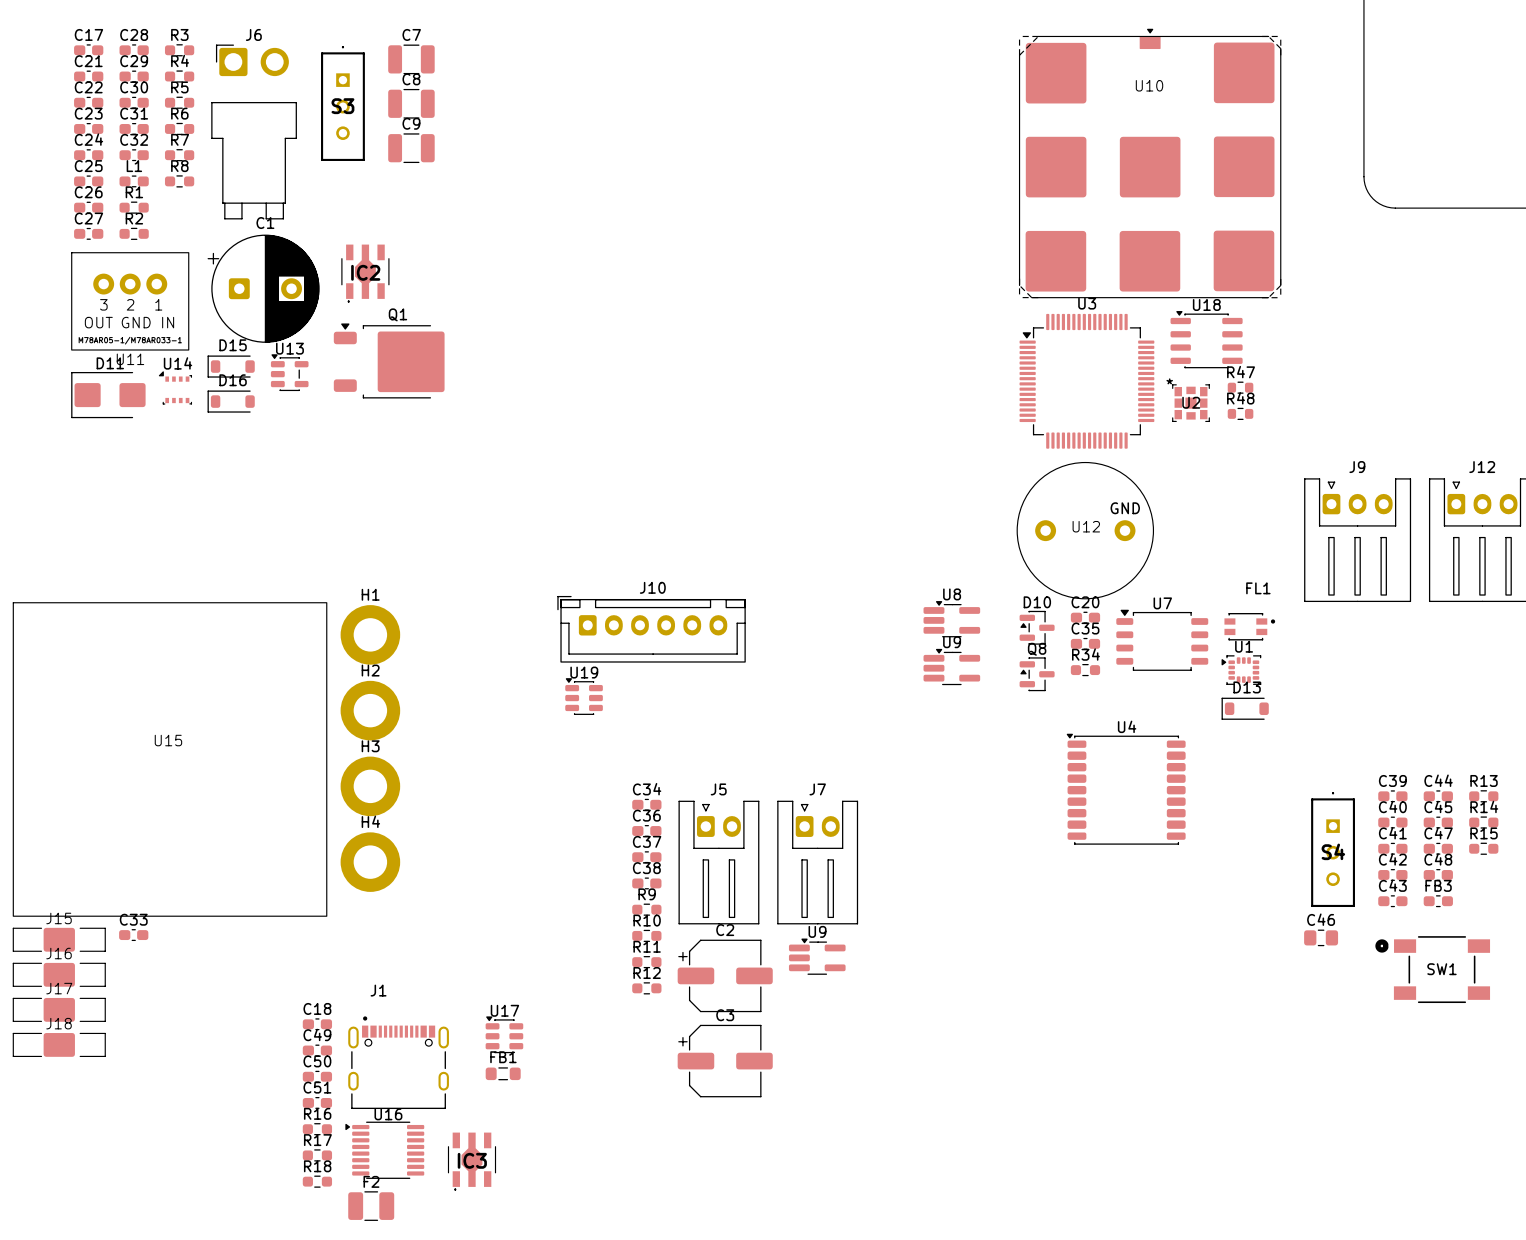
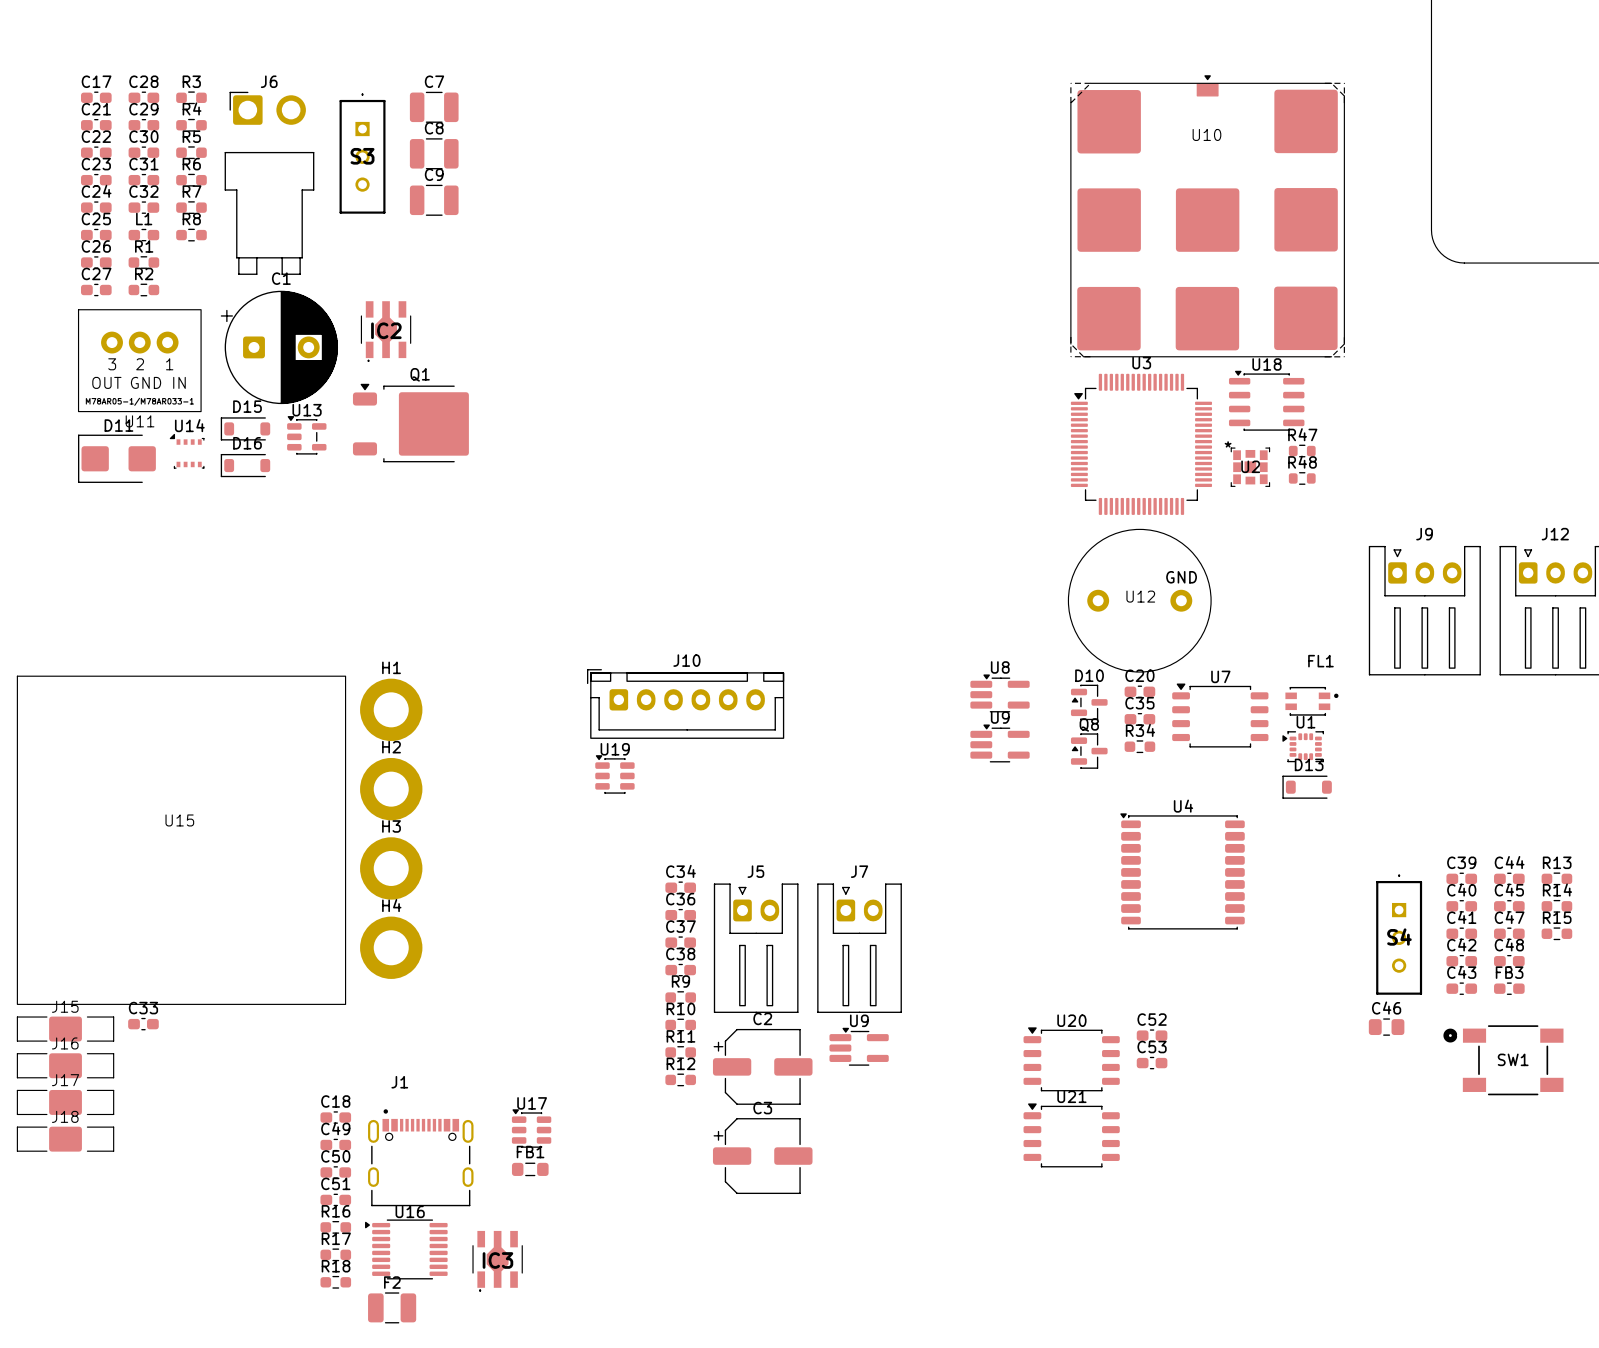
C52: none -> (1152, 1035)
U20: none -> (1071, 1059)
C53: none -> (1152, 1063)
U21: none -> (1071, 1135)

